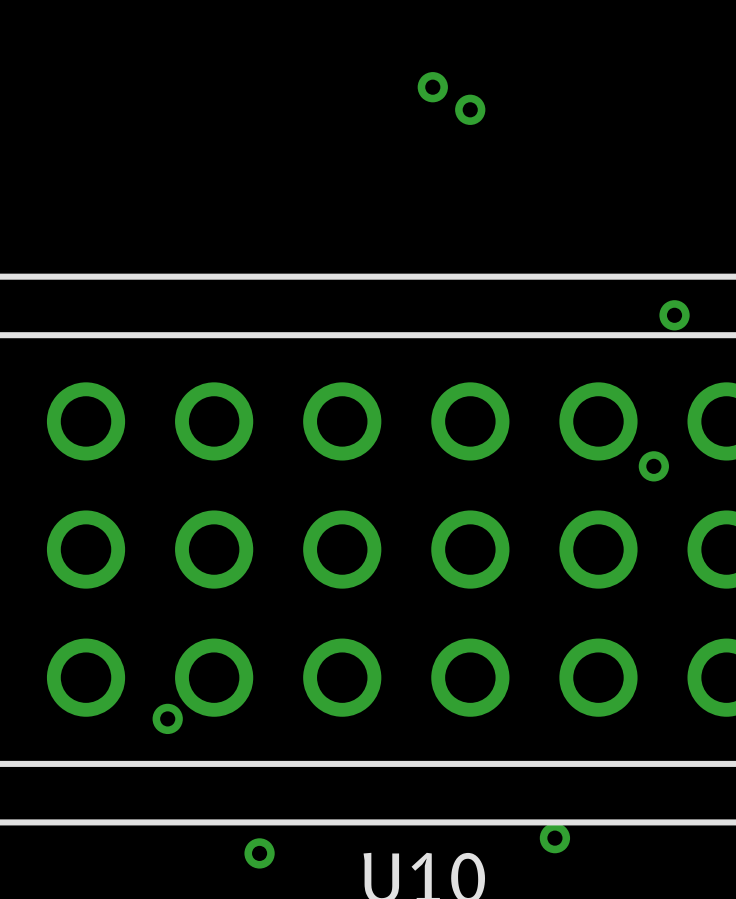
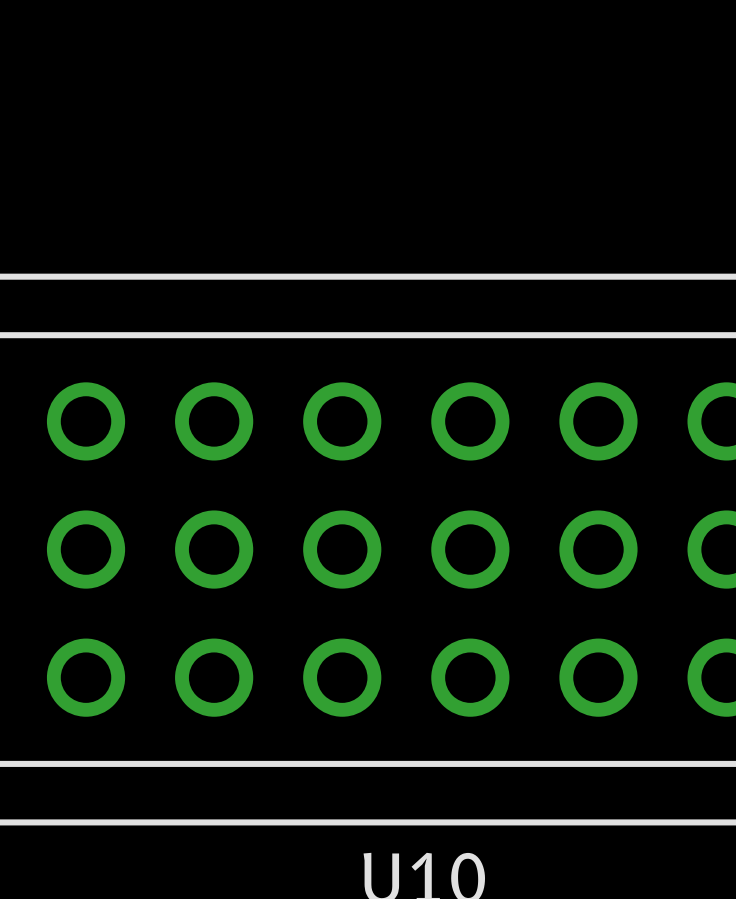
via: (432, 87) -> none
via: (470, 109) -> none
via: (674, 315) -> none
via: (653, 466) -> none
via: (167, 718) -> none
via: (554, 838) -> none
via: (259, 853) -> none

